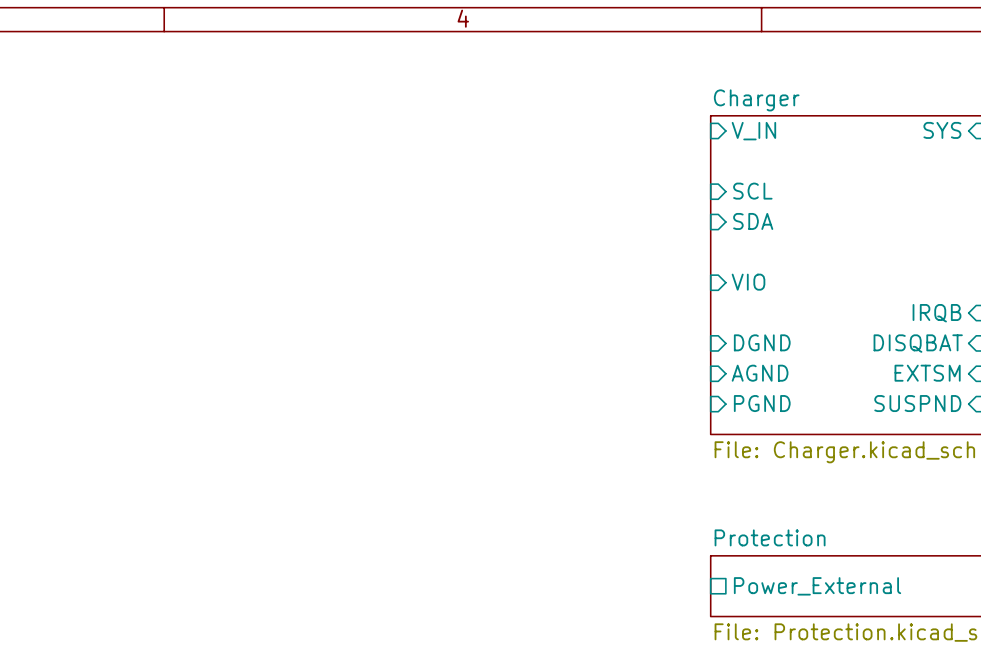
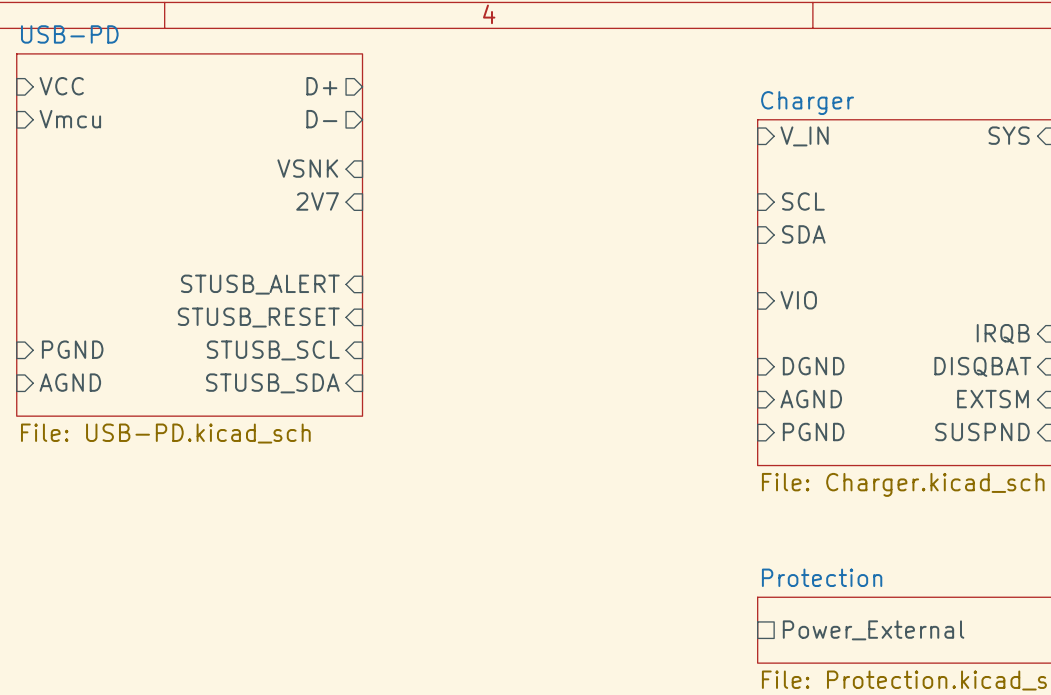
sheet pin: none -> VCC (61, 86)
sheet pin: none -> D+ (321, 86)
sheet pin: none -> Vmcu (70, 119)
sheet pin: none -> D- (321, 119)
sheet pin: none -> VSNK (307, 168)
sheet pin: none -> 2V7 (317, 201)
sheet USB-PD: none -> File: USB-PD.kicad_sch (189, 235)
sheet pin: none -> STUSB_ALERT (260, 284)
sheet pin: none -> STUSB_RESET (258, 317)
sheet pin: none -> PGND (72, 349)
sheet pin: none -> STUSB_SCL (273, 350)
sheet pin: none -> AGND (70, 382)
sheet pin: none -> STUSB_SDA (272, 383)

